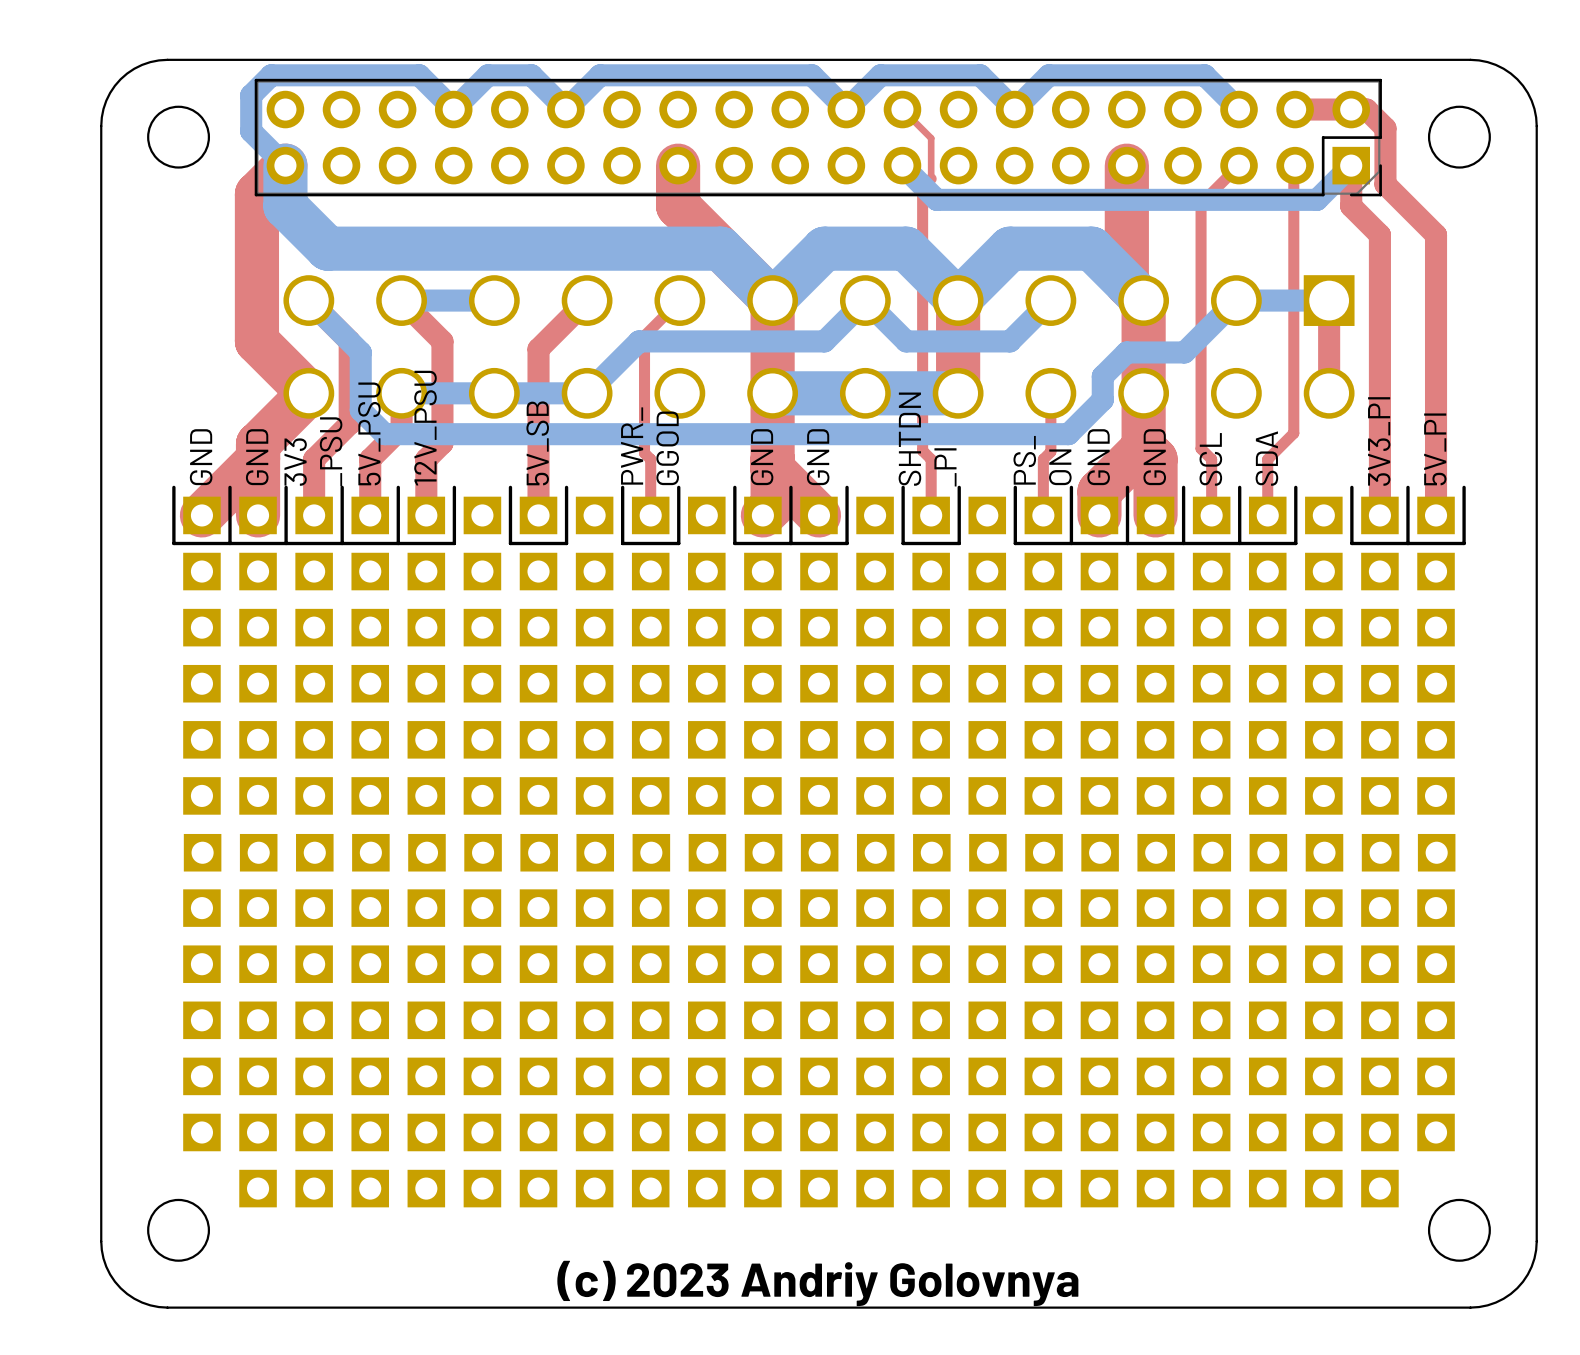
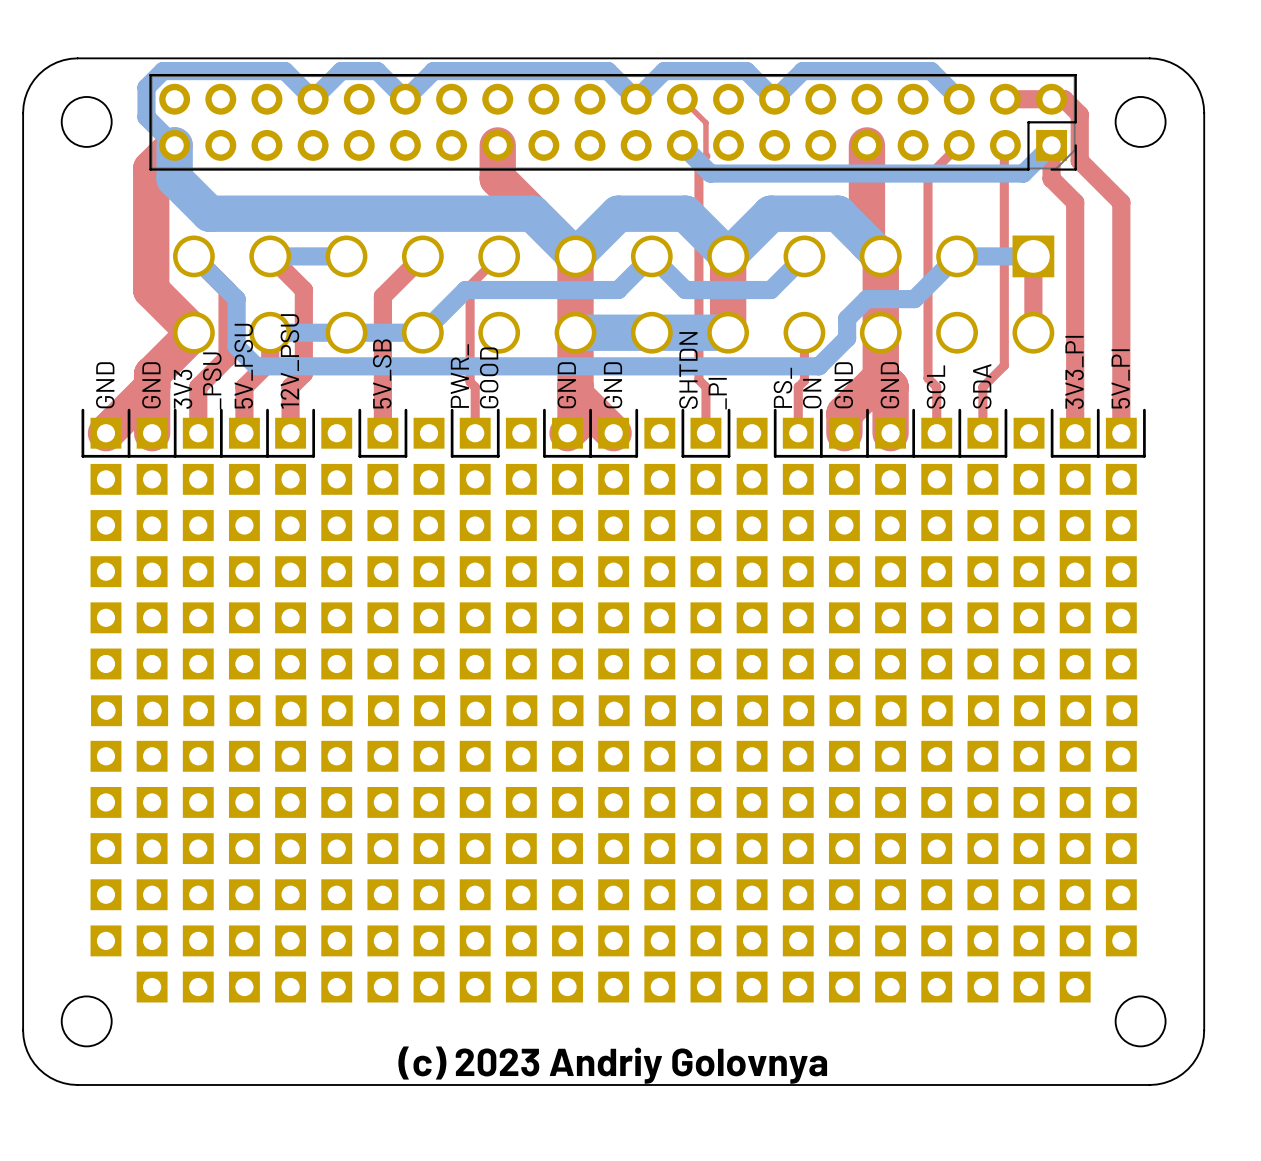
text: GGOD (667, 448) -> GOOD (489, 377)

